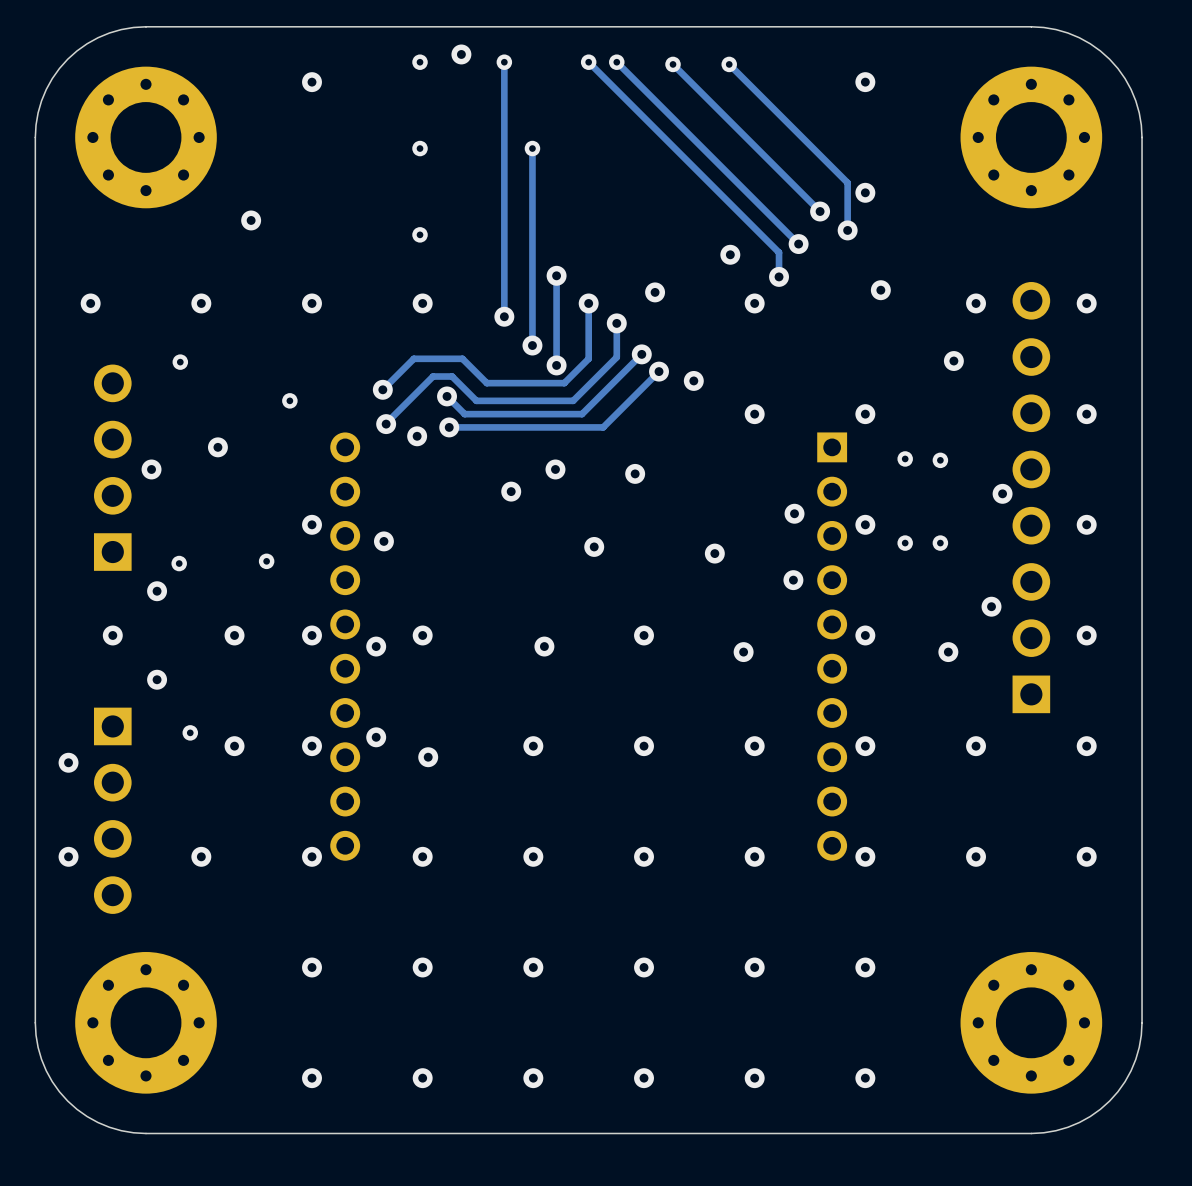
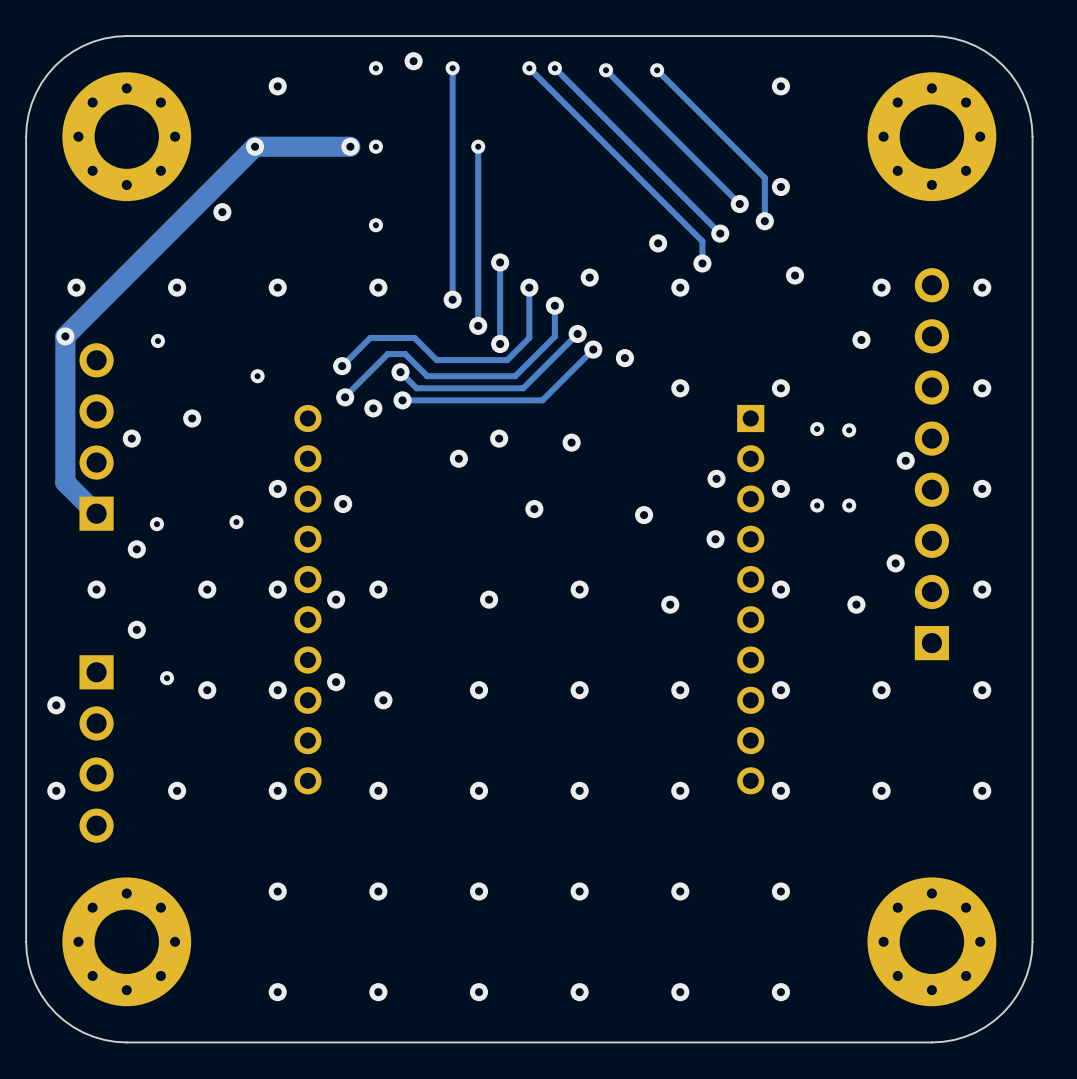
via: none -> (255, 146)
track: none -> (350, 146) (255, 146) (65, 336) (65, 482) (96, 513)
via: none -> (350, 146)
via: none -> (65, 336)

